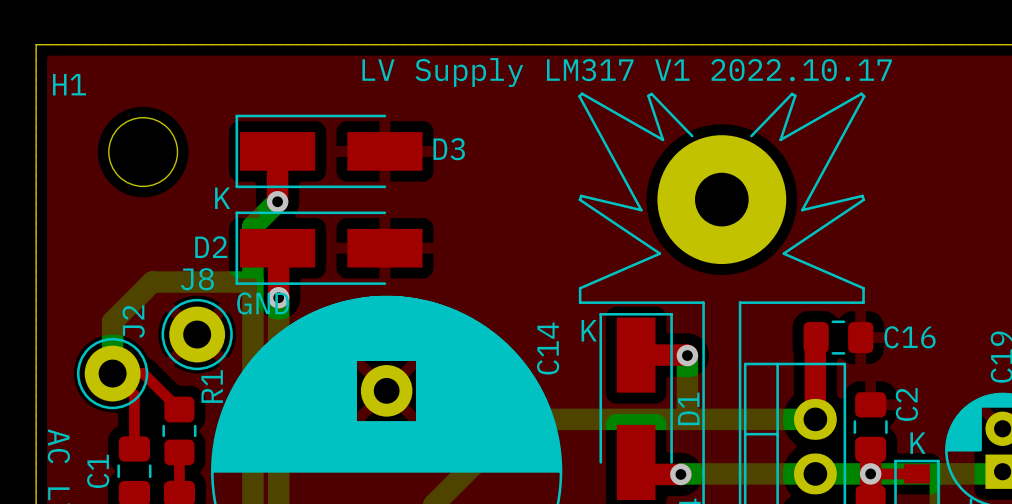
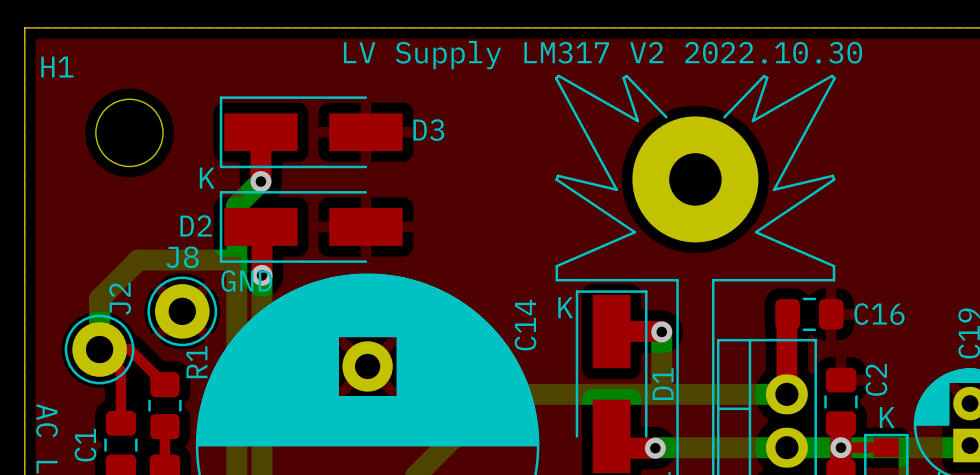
text: LV Supply LM317 V1 2022.10.17 (627, 72) -> LV Supply LM317 V2 2022.10.30 (602, 55)

